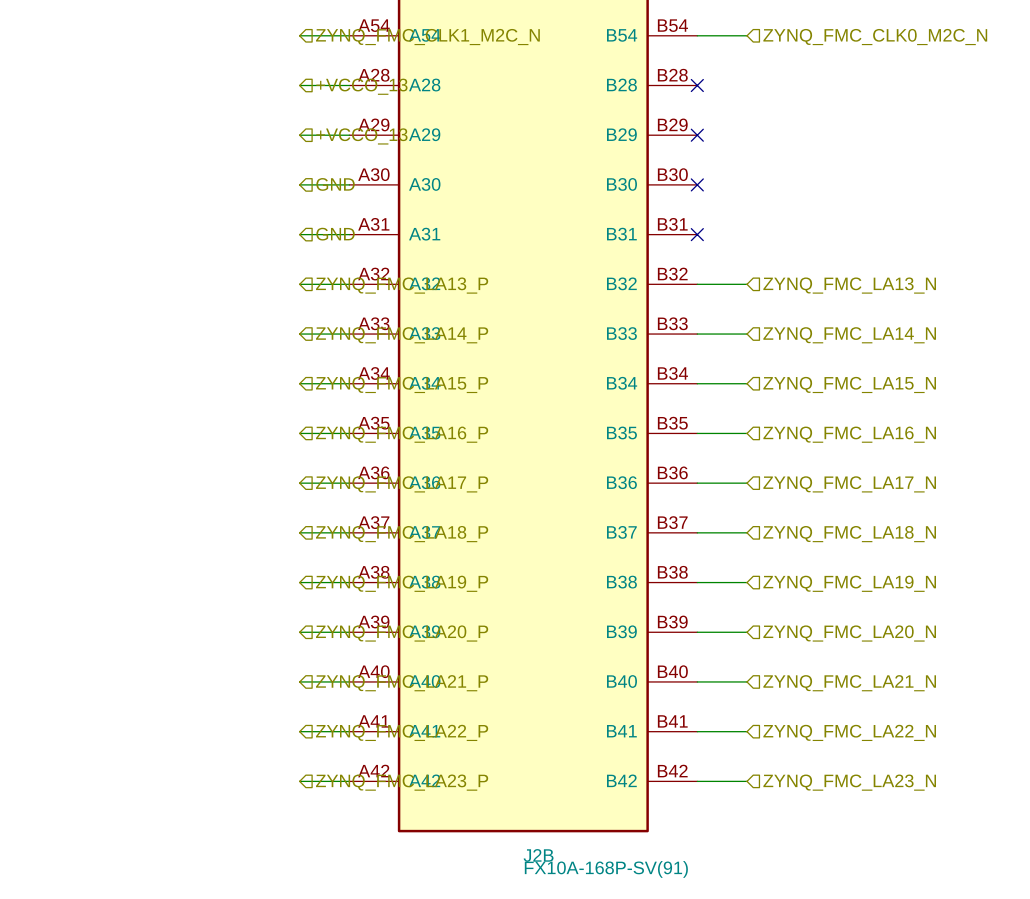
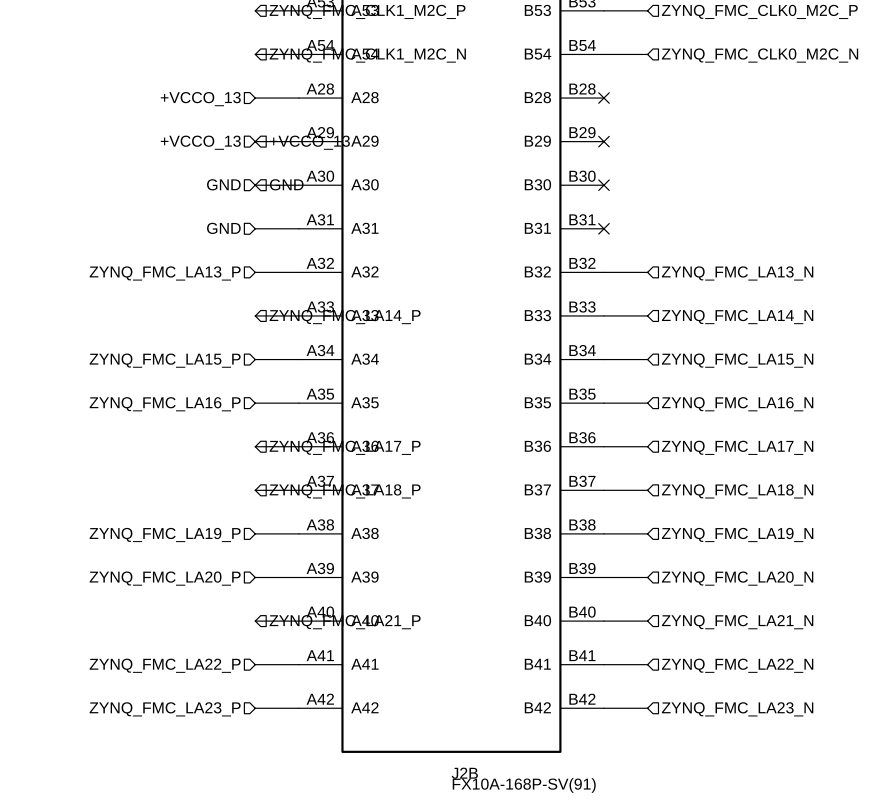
hierarchical label: none -> +VCCO_13 (200, 99)
hierarchical label: +VCCO_13 (361, 86) -> none
hierarchical label: none -> +VCCO_13 (200, 142)
hierarchical label: none -> GND (223, 184)
hierarchical label: none -> GND (223, 228)
hierarchical label: GND (335, 234) -> none
hierarchical label rotation: 0° (402, 285) -> 180° (165, 273)
hierarchical label position: ZYNQ_FMC_LA13_P (402, 285) -> ZYNQ_FMC_LA13_P (165, 273)
hierarchical label rotation: 0° (402, 384) -> 180° (165, 360)
hierarchical label position: ZYNQ_FMC_LA15_P (402, 384) -> ZYNQ_FMC_LA15_P (165, 360)
hierarchical label rotation: 0° (402, 434) -> 180° (165, 404)
hierarchical label position: ZYNQ_FMC_LA16_P (402, 434) -> ZYNQ_FMC_LA16_P (165, 404)
hierarchical label rotation: 0° (402, 583) -> 180° (165, 534)
hierarchical label position: ZYNQ_FMC_LA19_P (402, 583) -> ZYNQ_FMC_LA19_P (165, 534)
hierarchical label rotation: 0° (402, 633) -> 180° (165, 578)
hierarchical label position: ZYNQ_FMC_LA20_P (402, 633) -> ZYNQ_FMC_LA20_P (165, 578)
hierarchical label rotation: 0° (402, 732) -> 180° (165, 665)
hierarchical label position: ZYNQ_FMC_LA22_P (402, 732) -> ZYNQ_FMC_LA22_P (165, 665)
hierarchical label rotation: 0° (402, 782) -> 180° (165, 709)
hierarchical label position: ZYNQ_FMC_LA23_P (402, 782) -> ZYNQ_FMC_LA23_P (165, 709)

